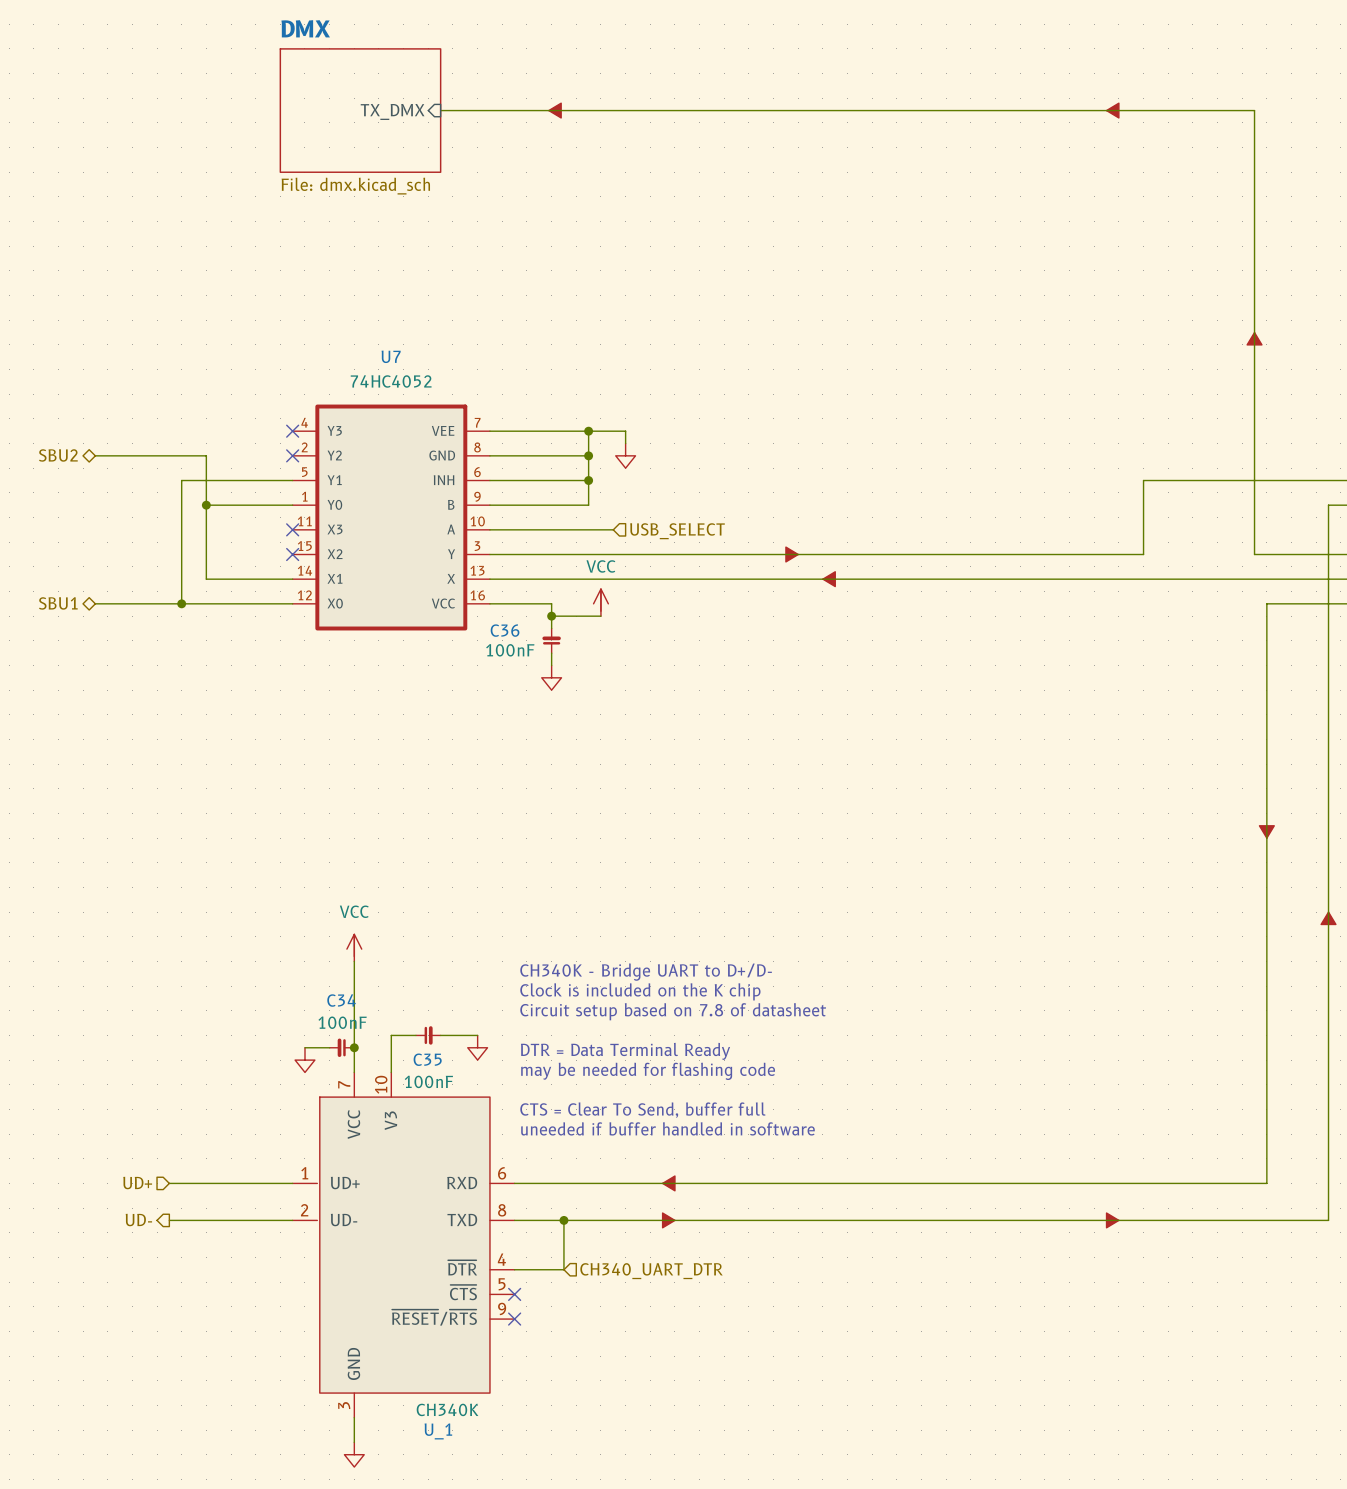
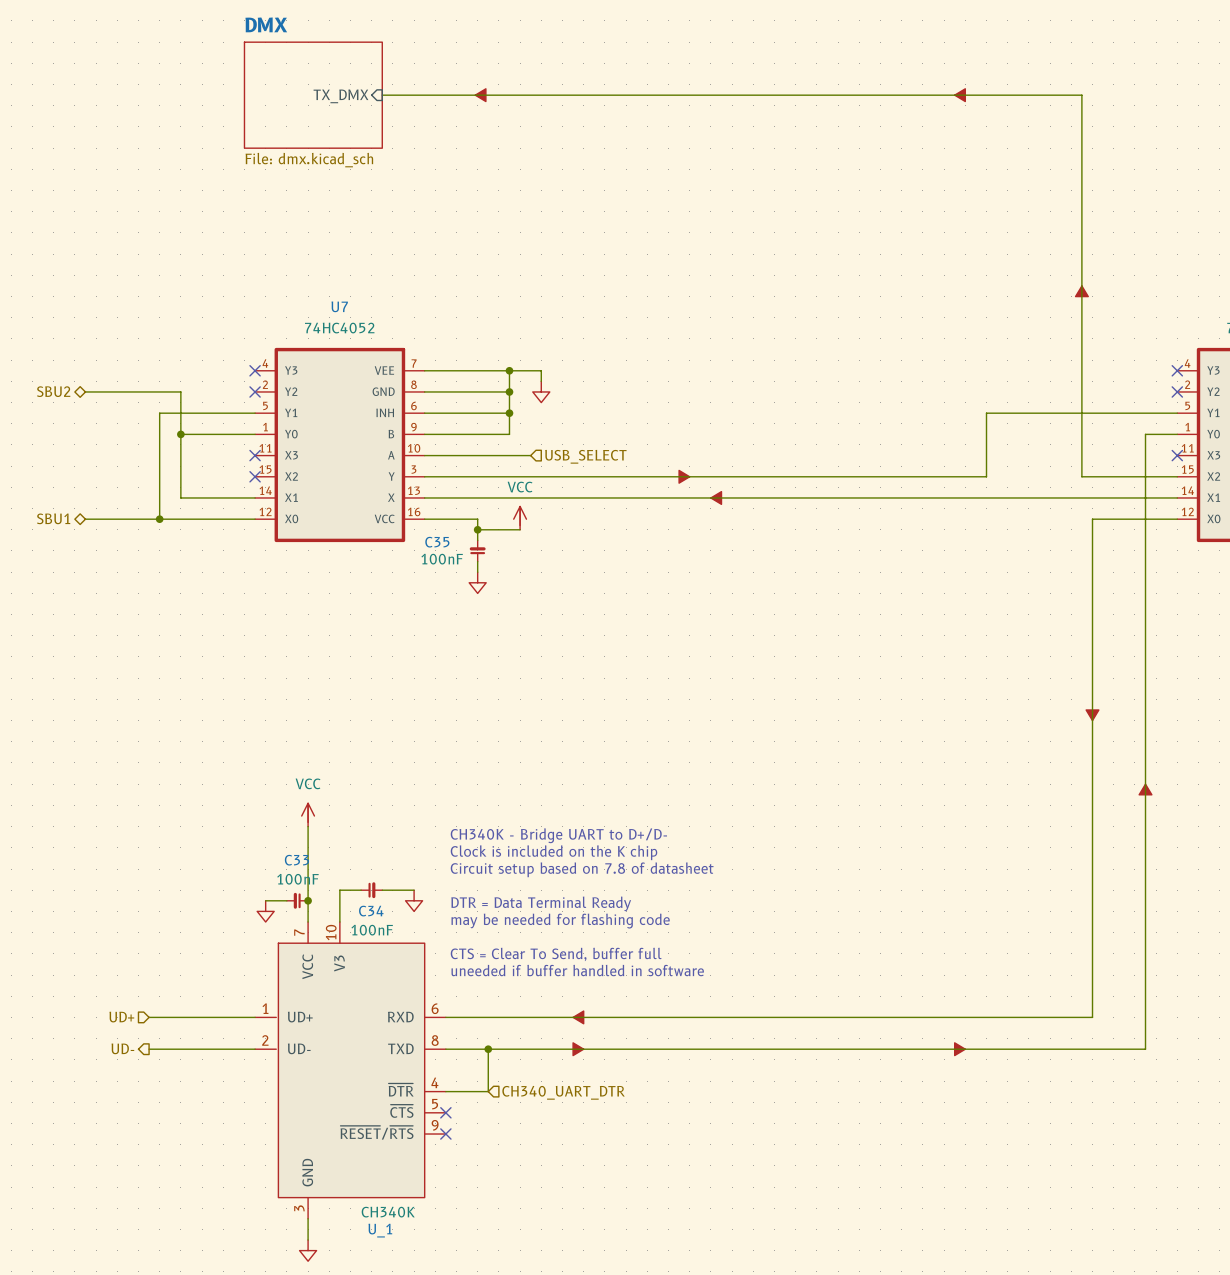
C36 name: C36 (505, 630) -> C35 (437, 542)
C34 name: C34 (341, 1000) -> C33 (296, 860)
C35 name: C35 (427, 1059) -> C34 (371, 911)

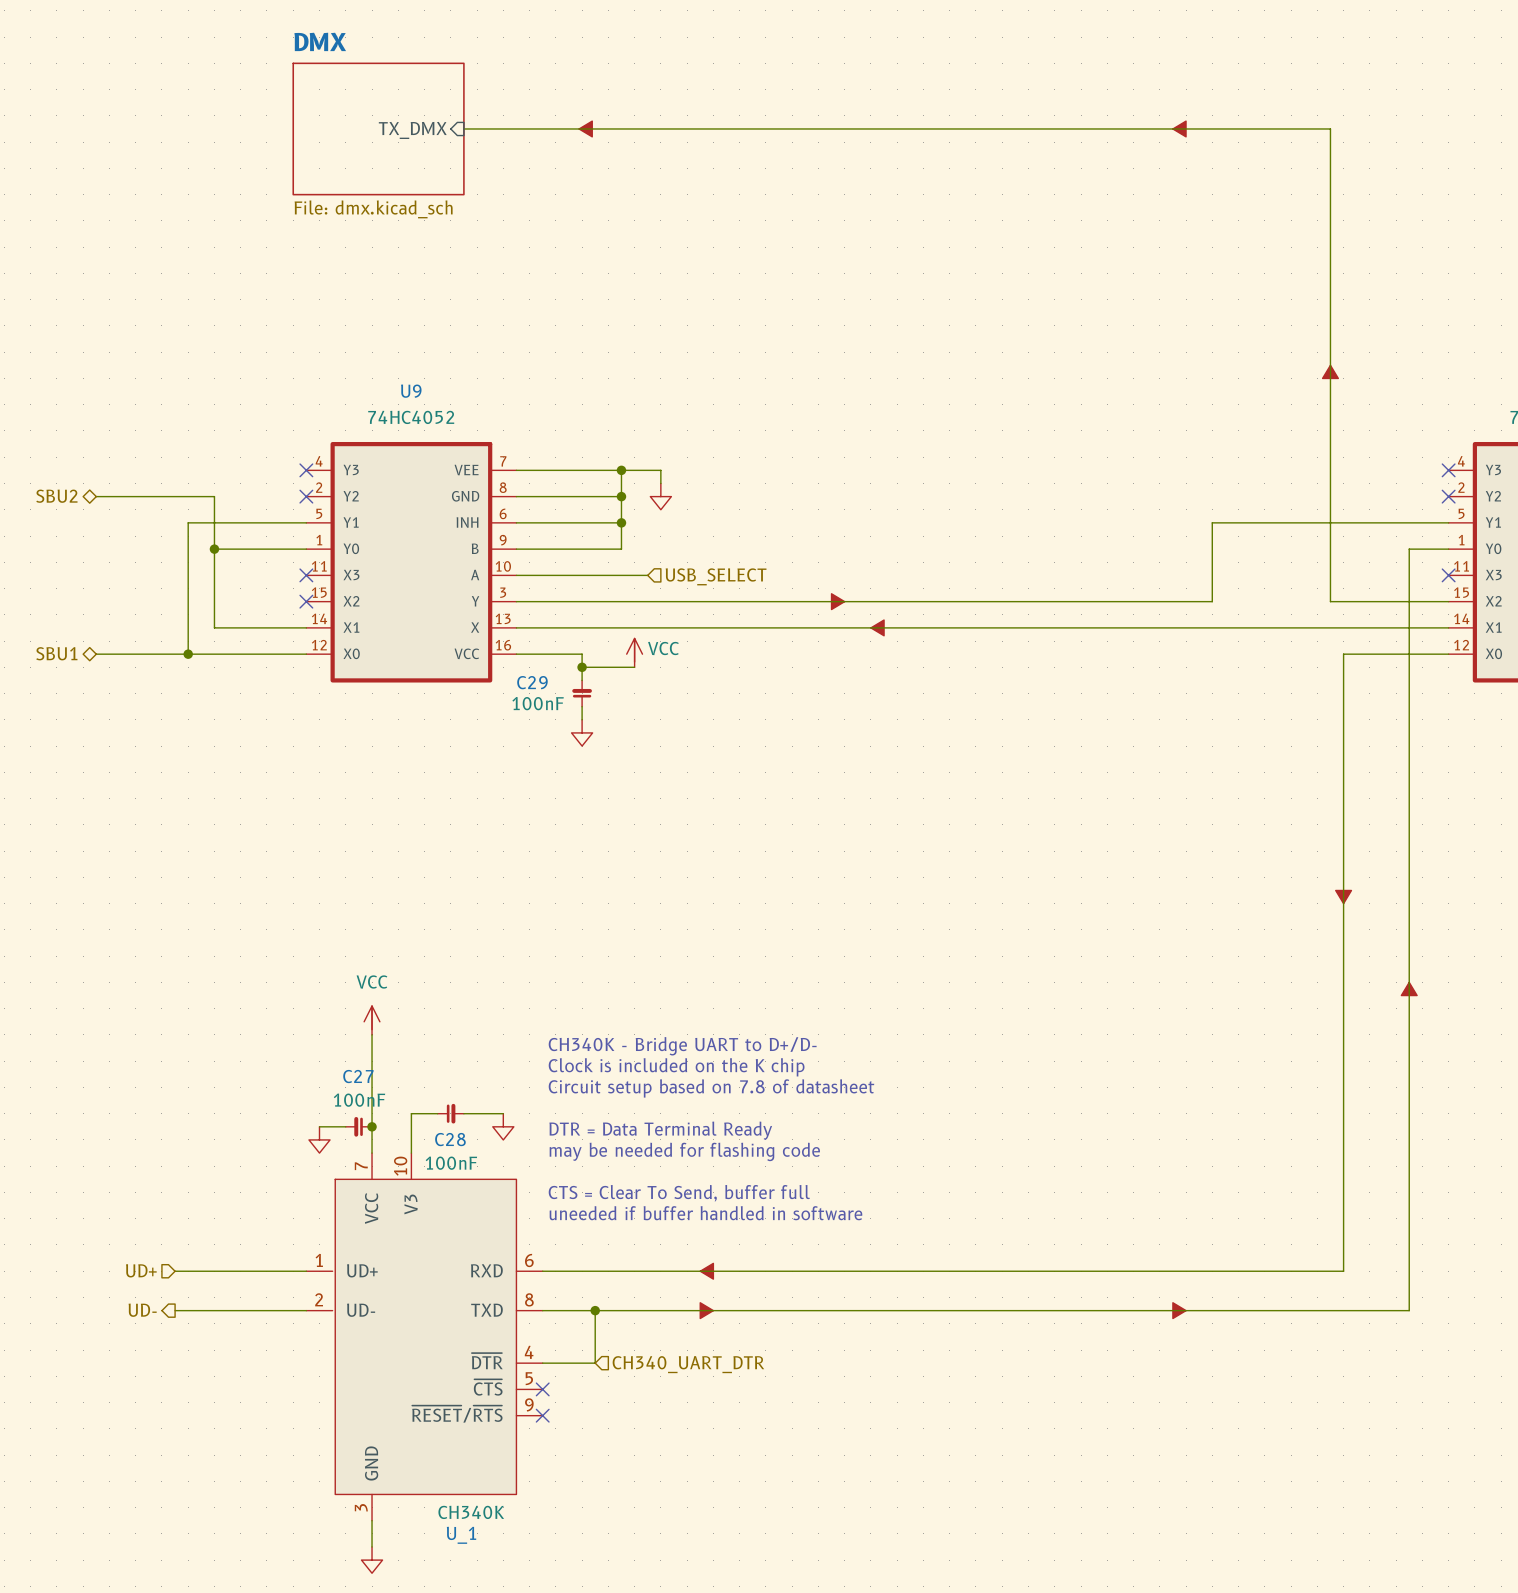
U7 name: U7 (339, 306) -> U9 (411, 391)
power symbol text position: VCC (520, 487) -> VCC (663, 648)
C35 name: C35 (437, 542) -> C29 (532, 682)
C33 name: C33 (296, 860) -> C27 (358, 1076)
C34 name: C34 (371, 911) -> C28 (450, 1139)

